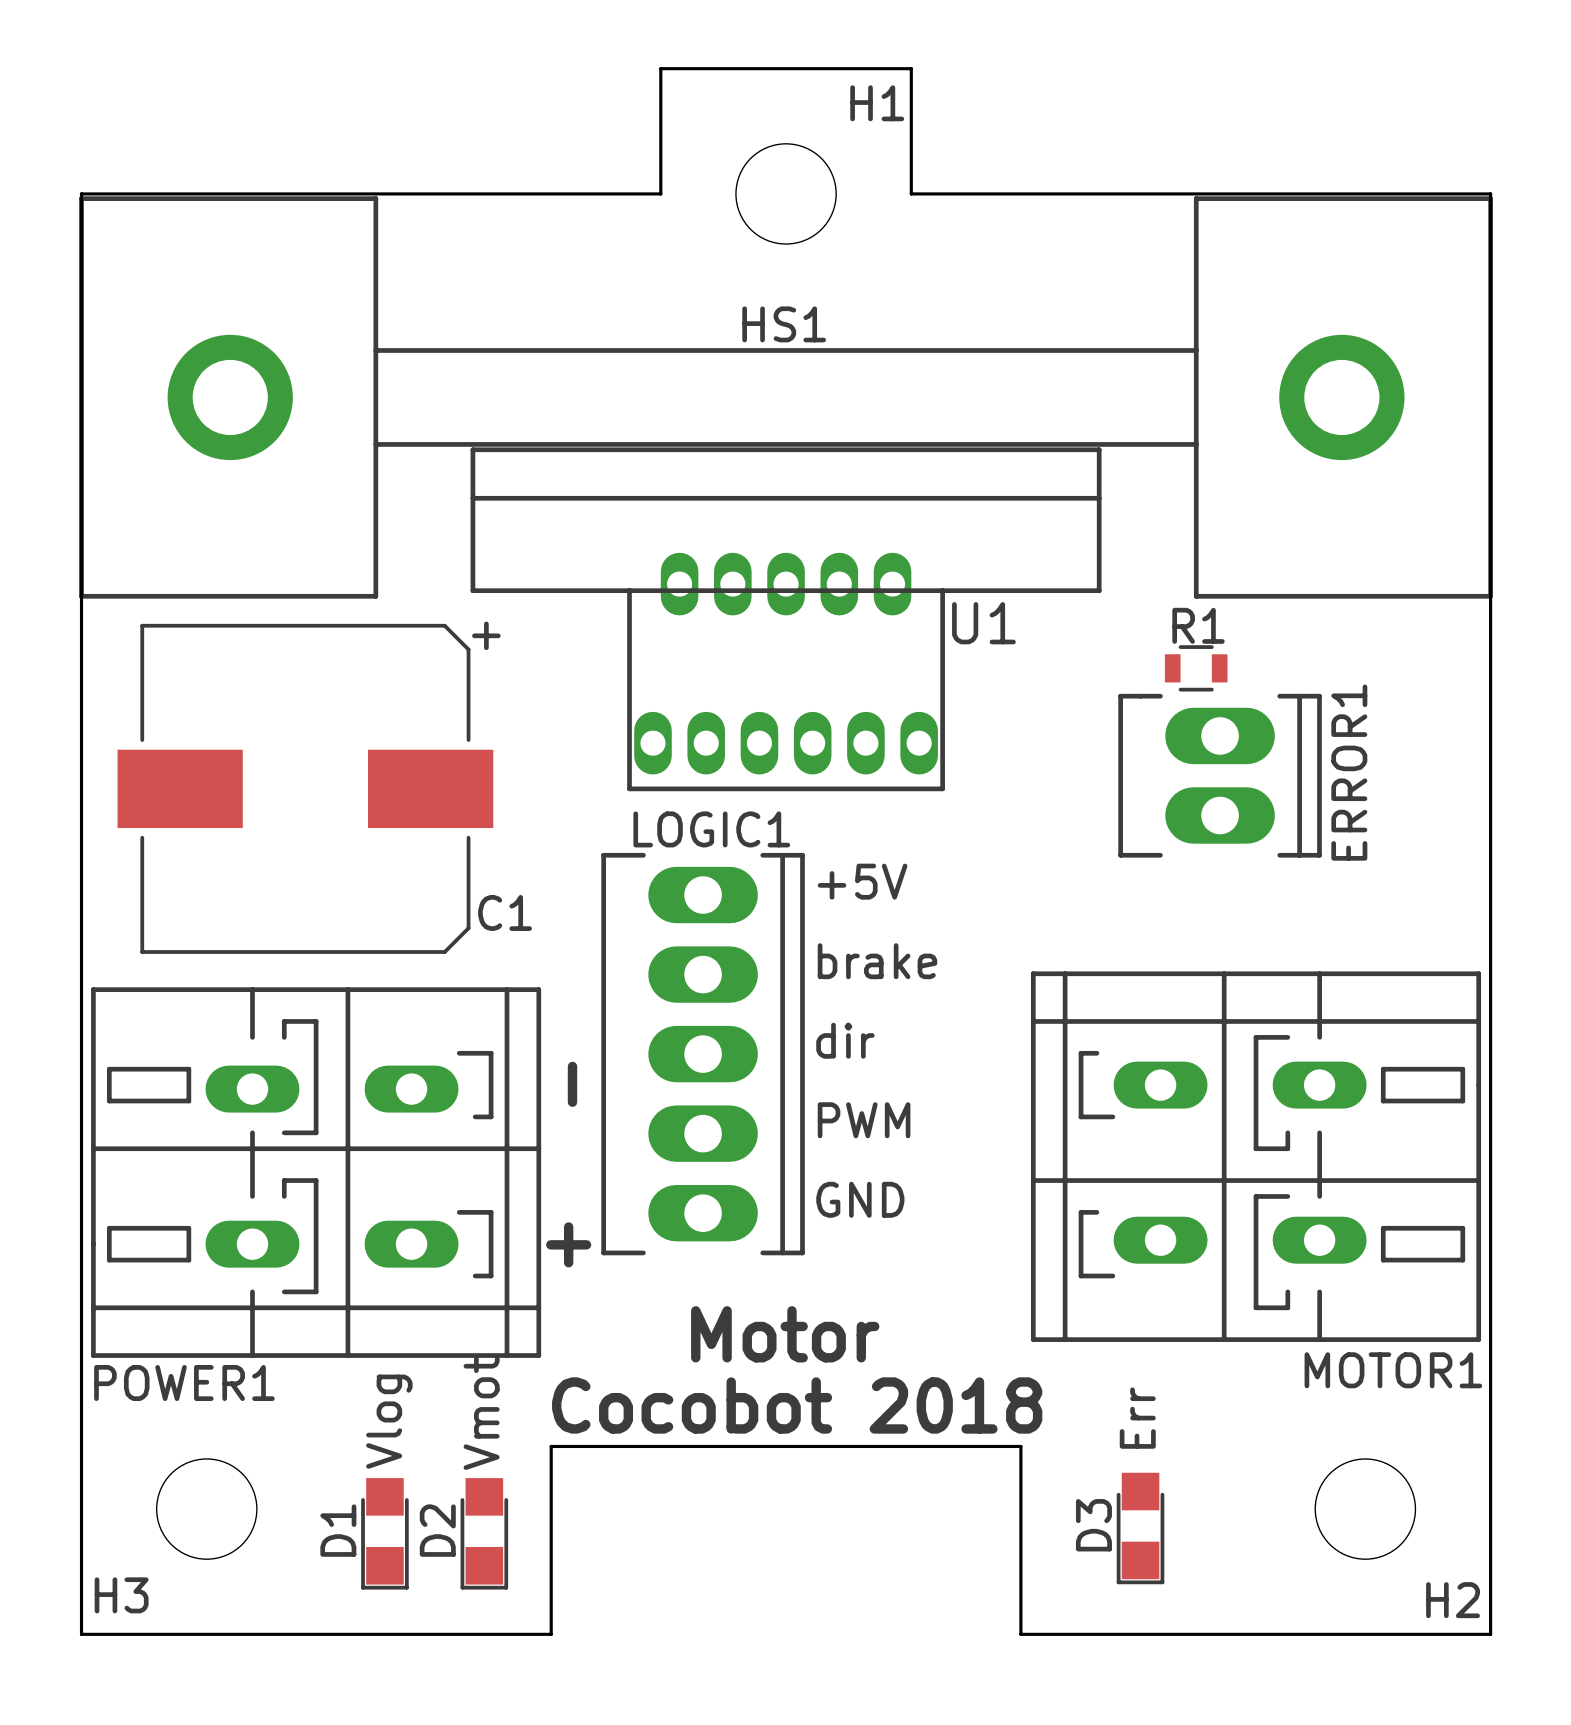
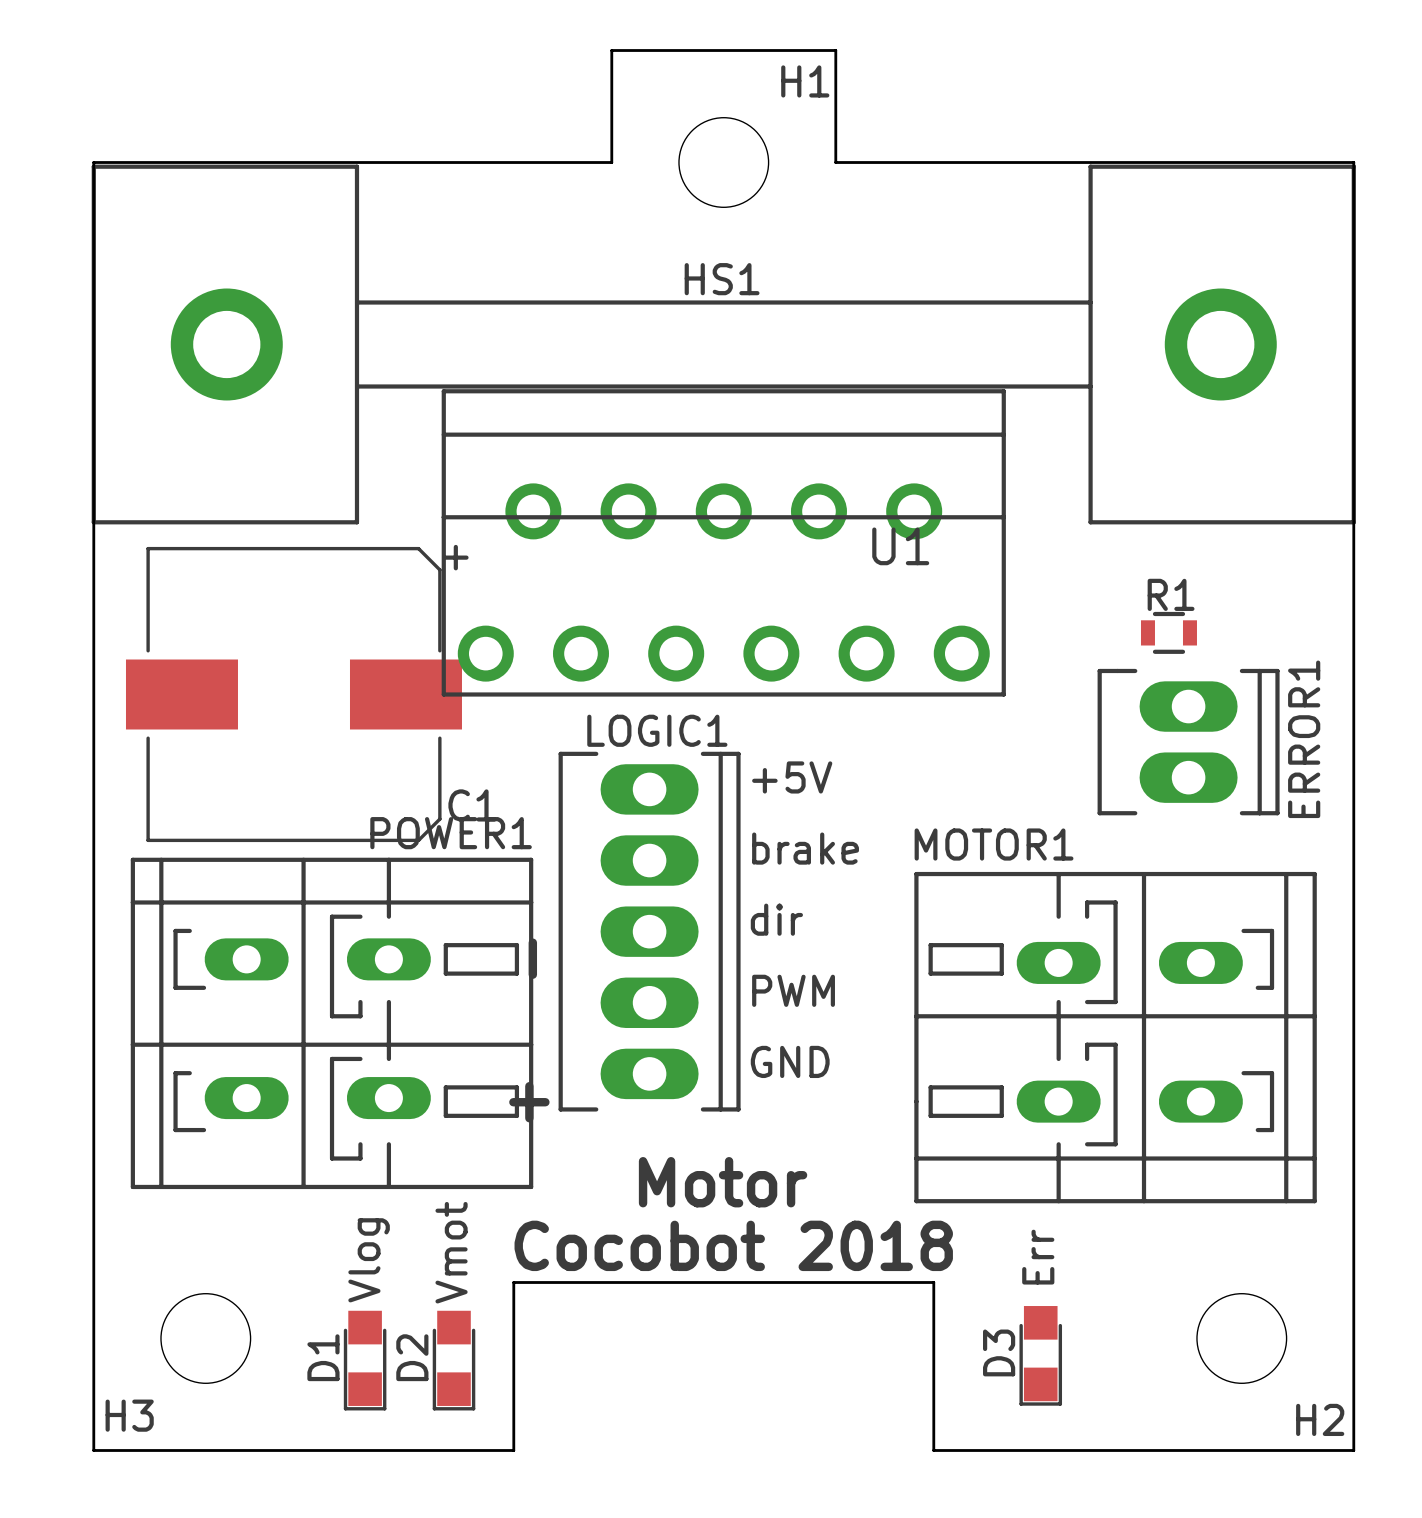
U1 footprint: [470, 447, 1102, 792] -> [441, 389, 1006, 697]
R1 footprint: [1164, 645, 1228, 692] -> [1140, 611, 1197, 654]
ERROR1 position: (1220, 775) -> (1188, 742)
MOTOR1 rotation: 0° (1256, 1156) -> 180° (1115, 1037)
POWER1 rotation: 0° (316, 1172) -> 180° (332, 1023)

